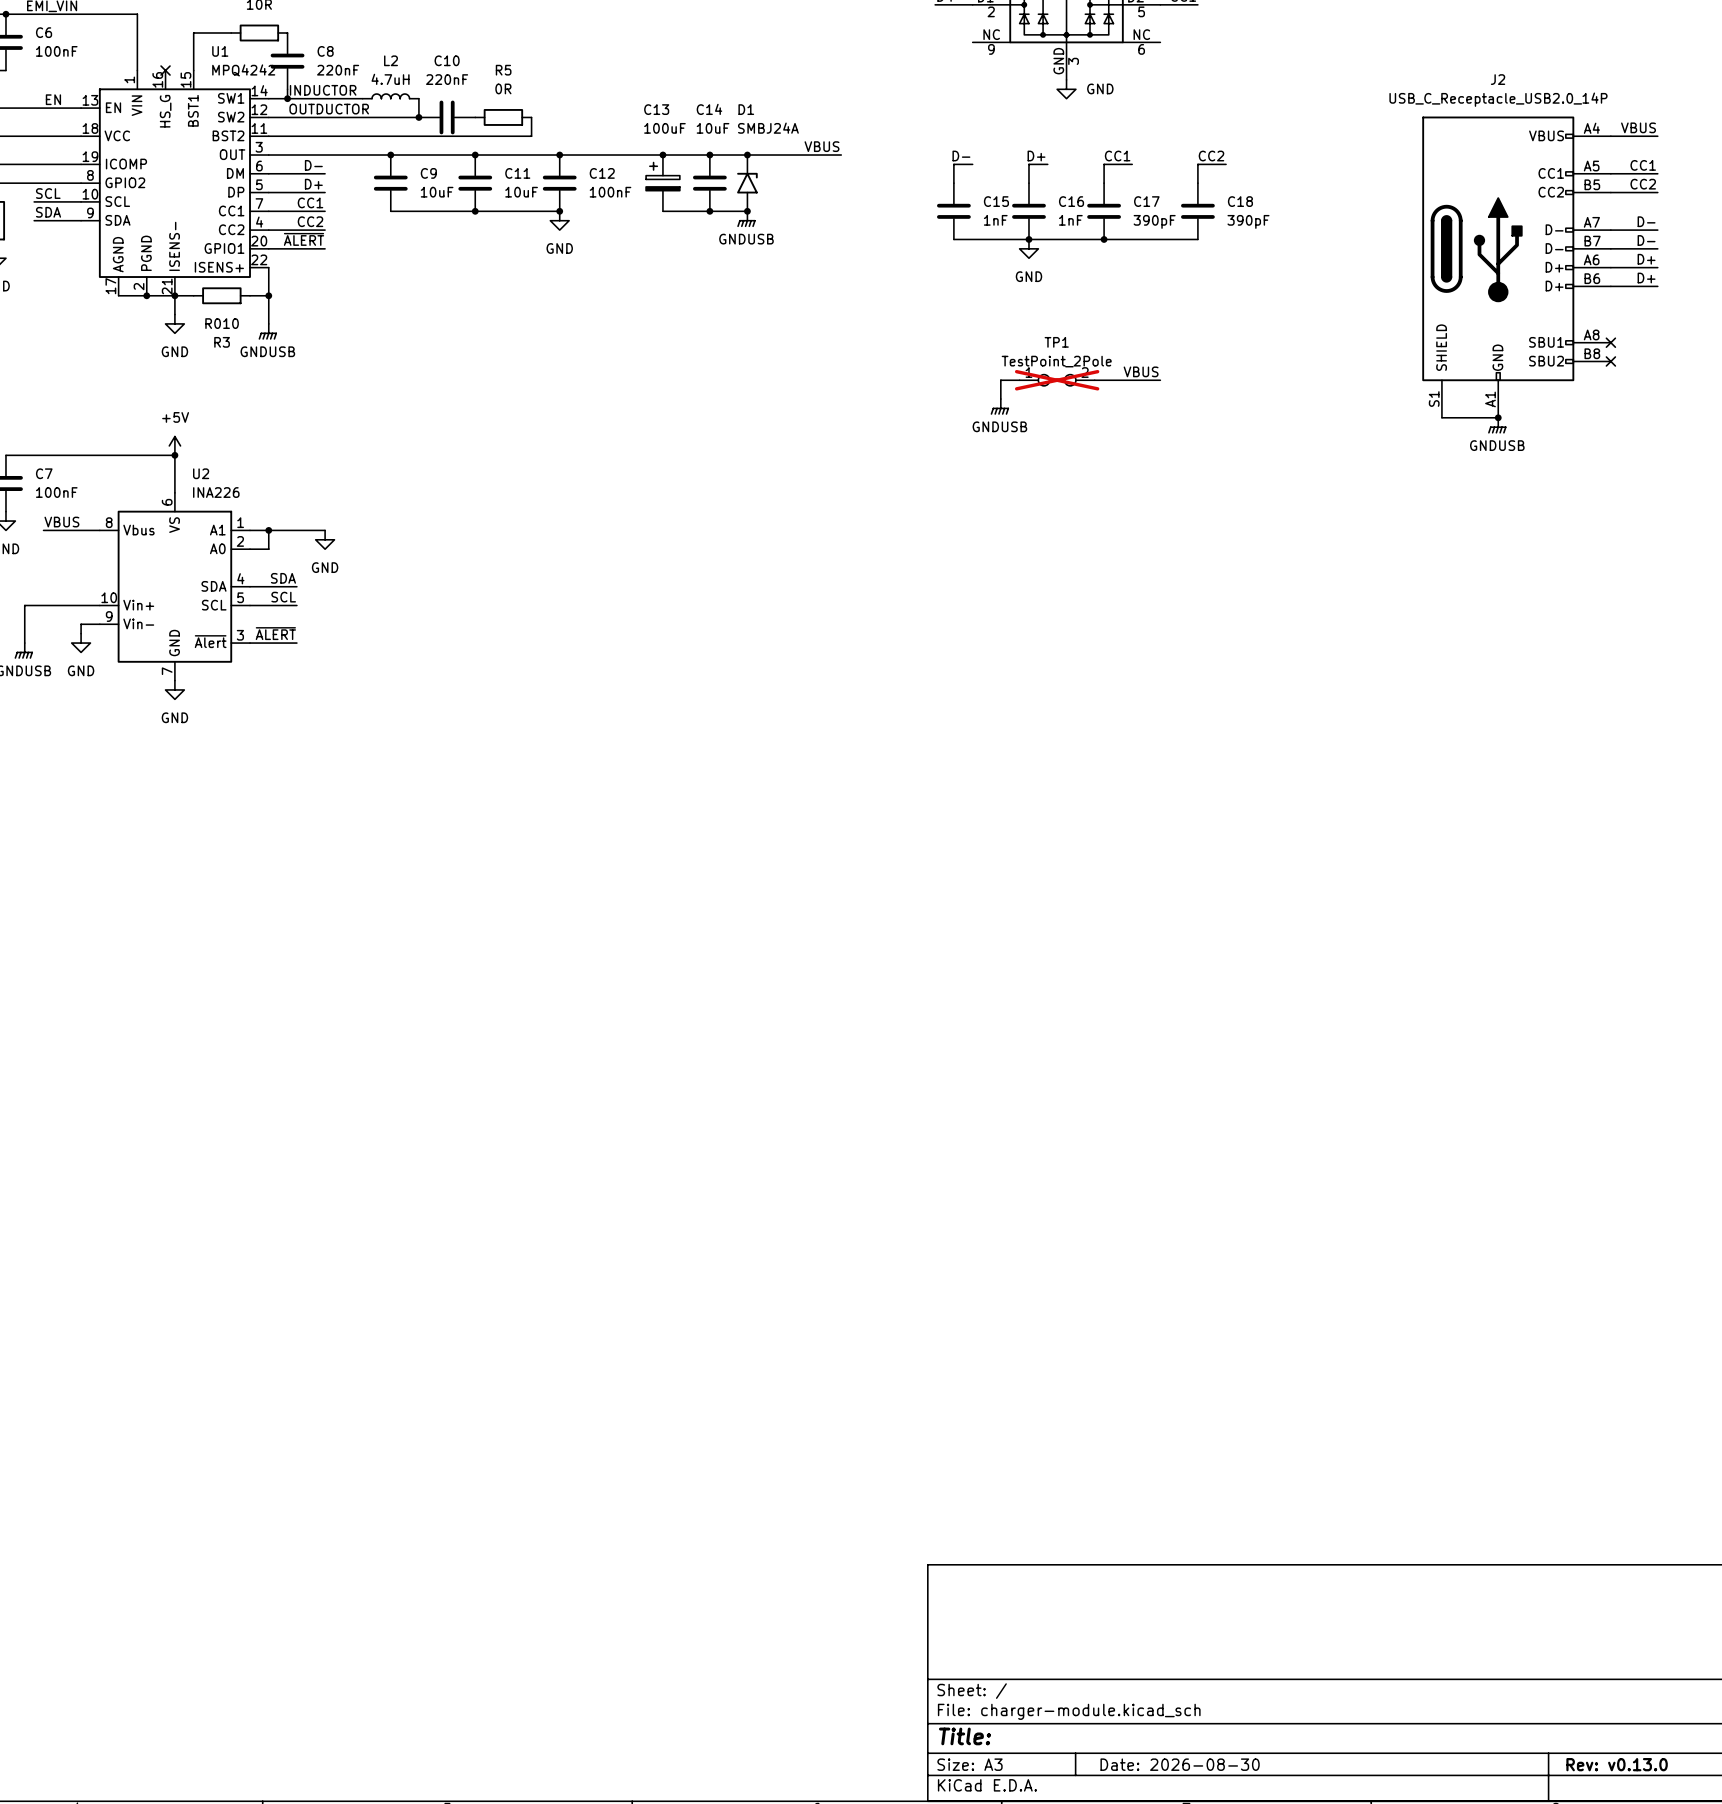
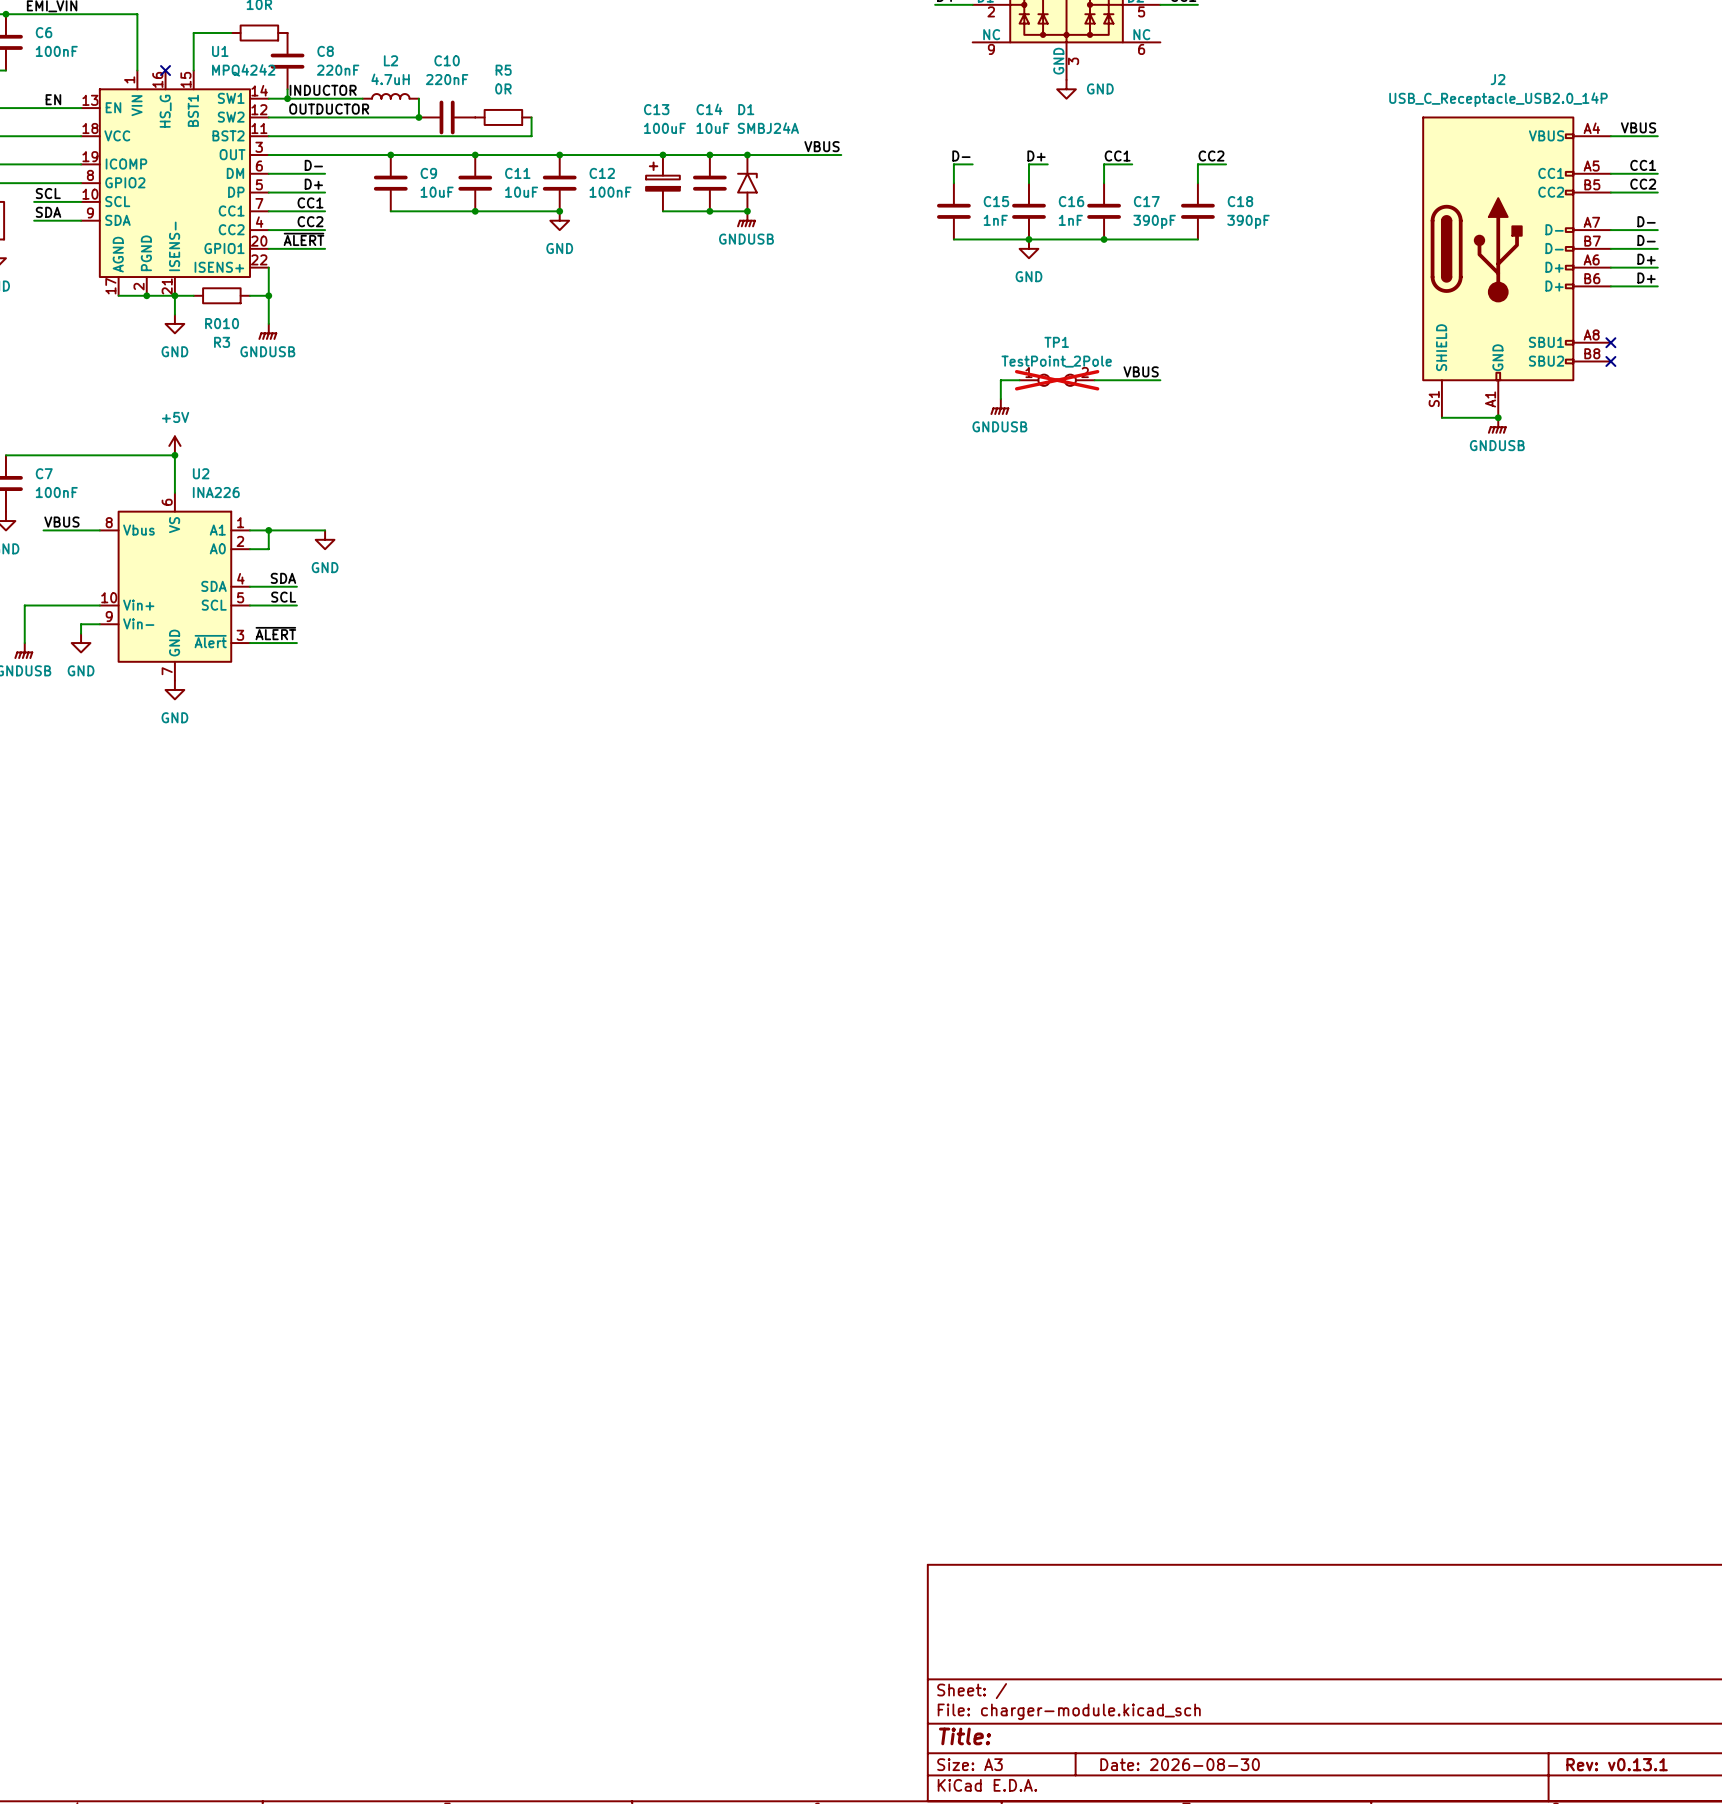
title block: Rev: v0.13.0 (1617, 1764) -> Rev: v0.13.1 (1617, 1764)

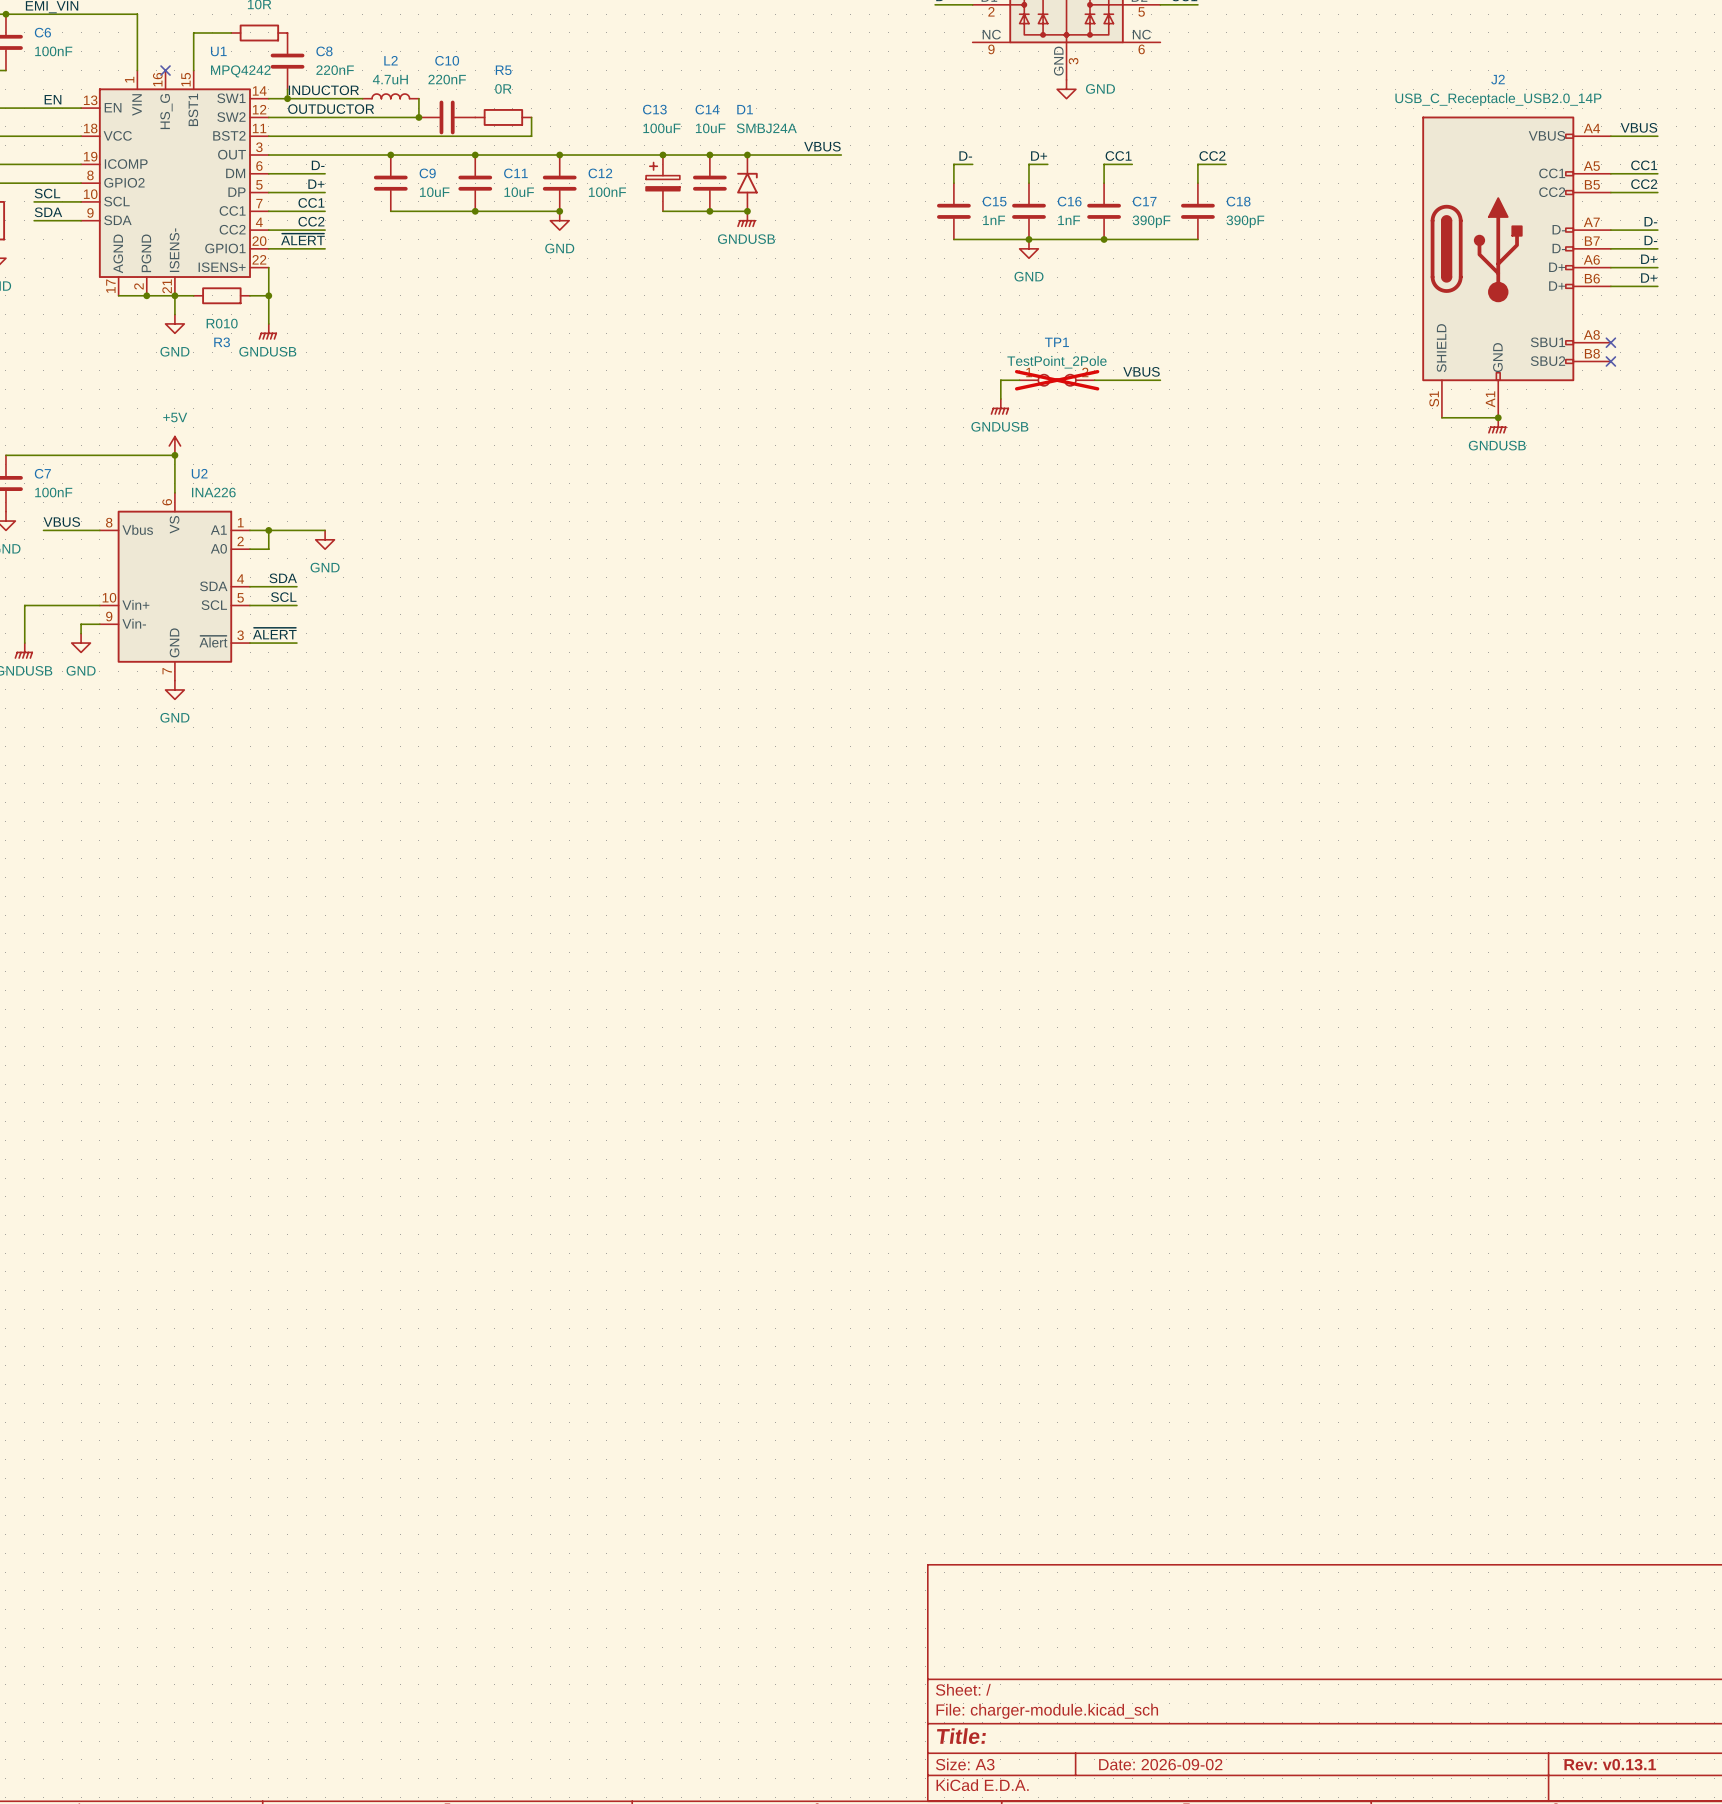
title block: Date: 2026-08-30 (1180, 1764) -> Date: 2026-09-02 (1160, 1764)

